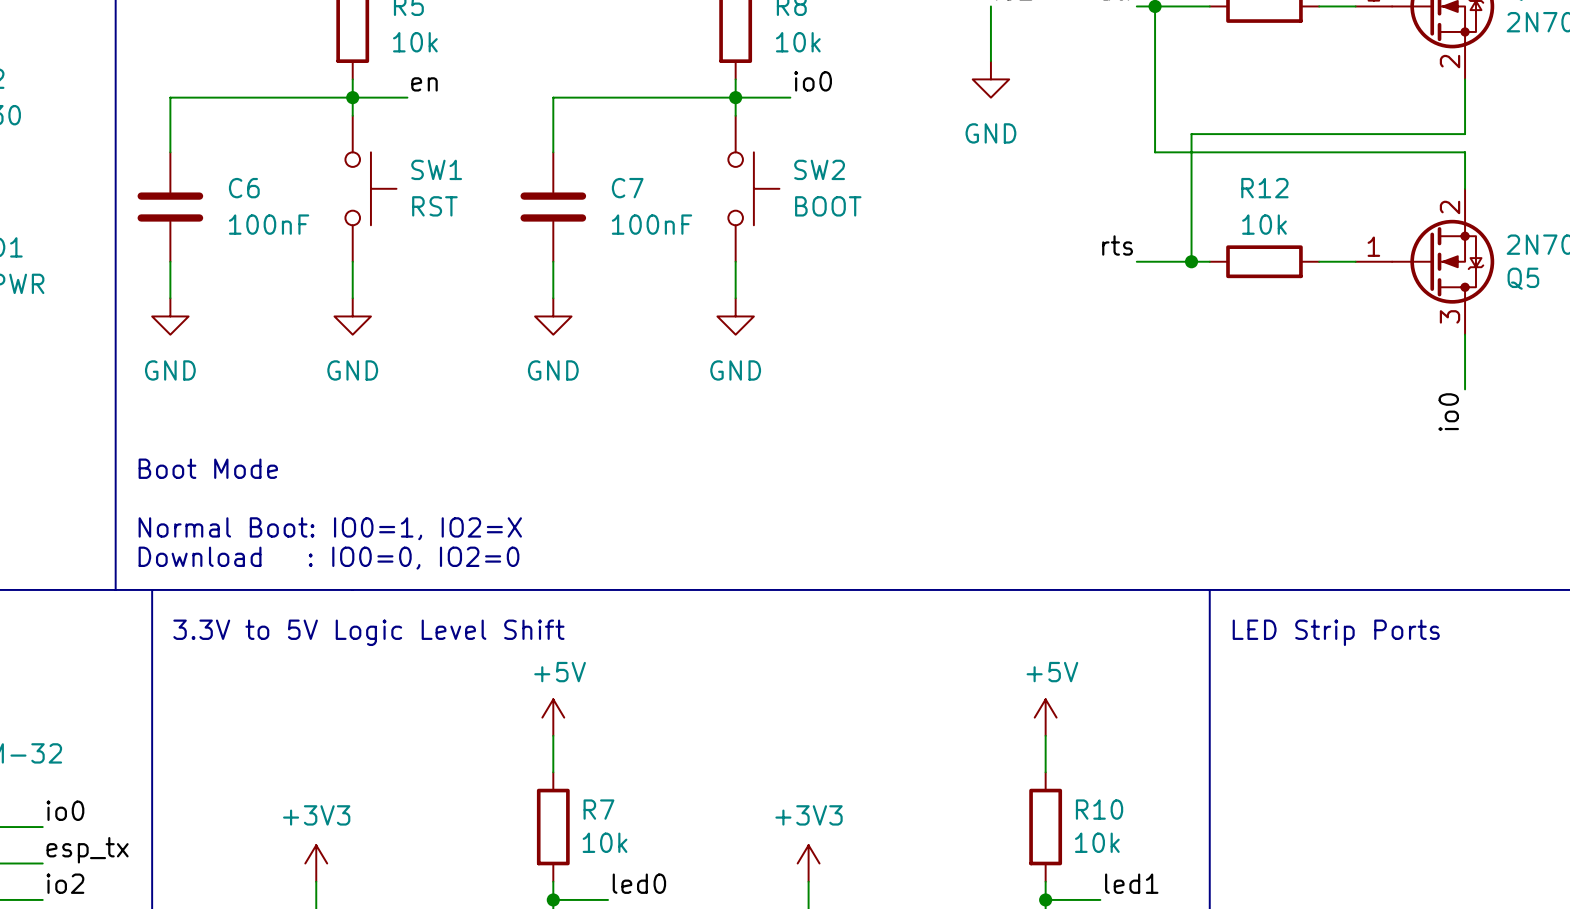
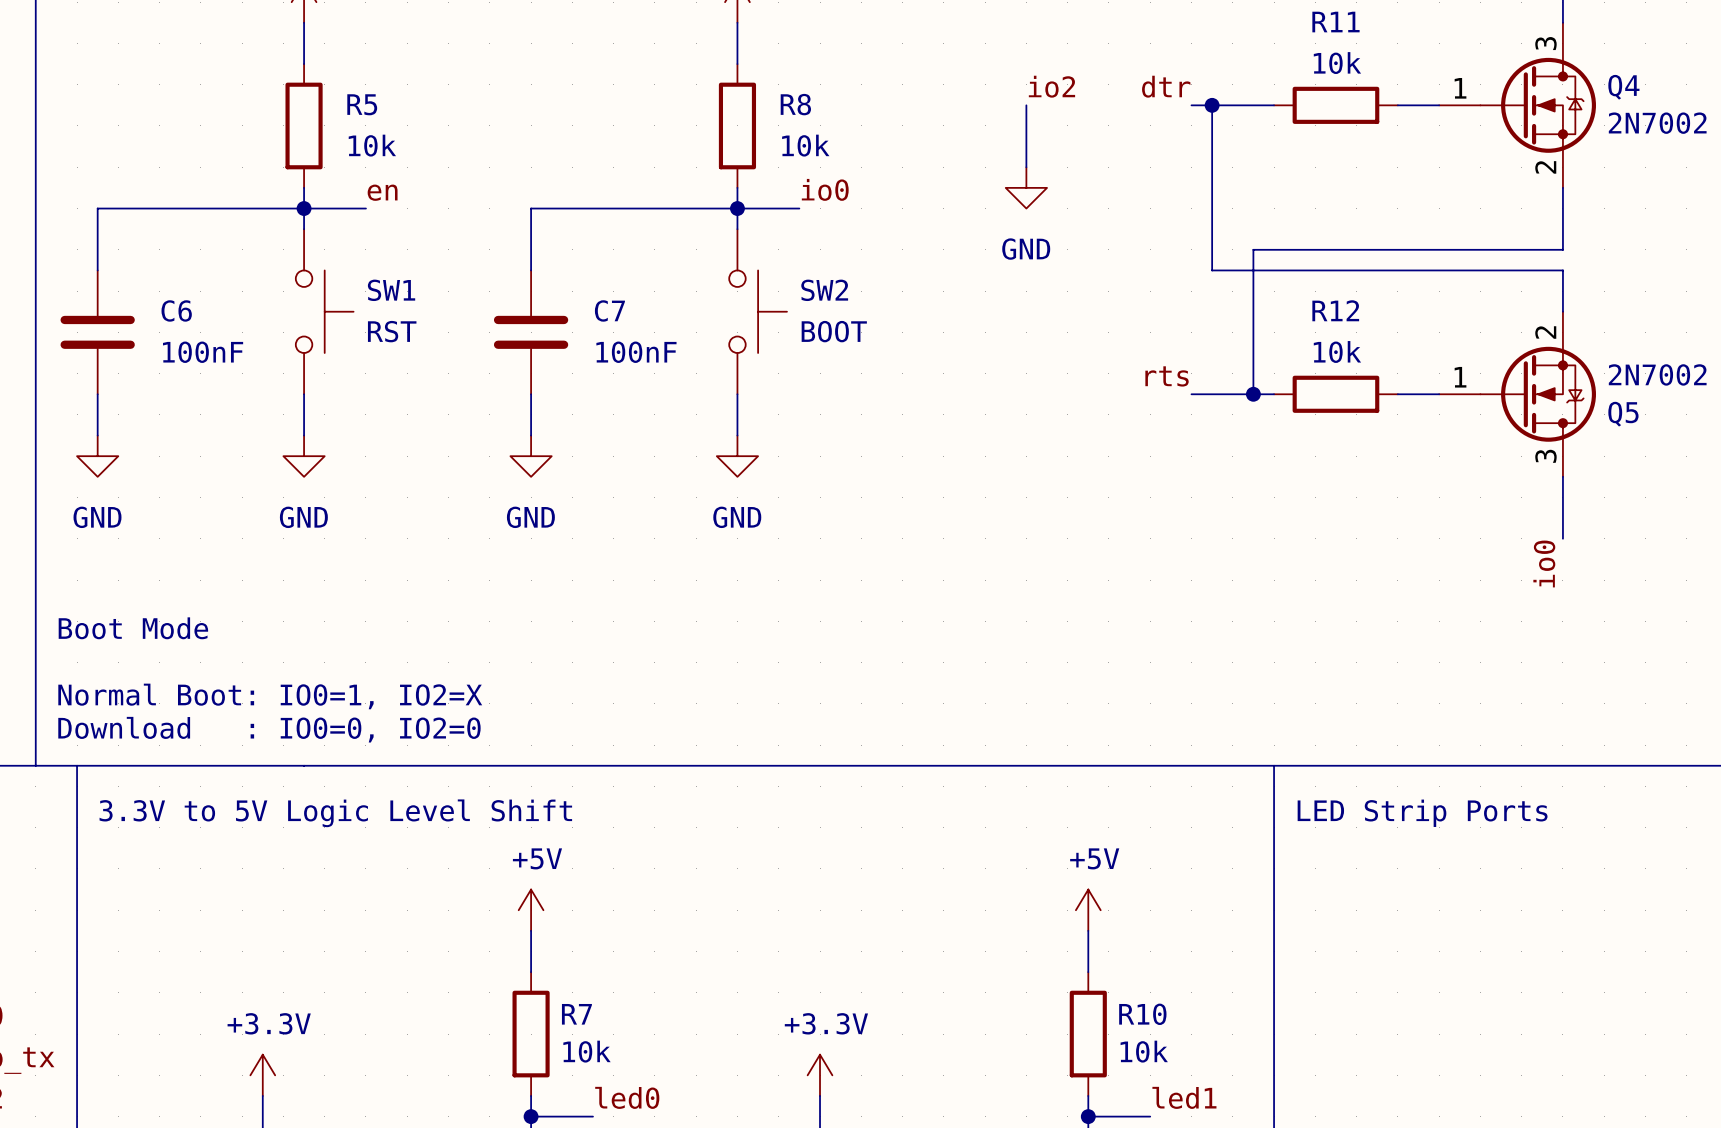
power symbol: +3V3 (316, 863) -> +3.3V (262, 1075)
power symbol: +3V3 (808, 863) -> +3.3V (820, 1075)

